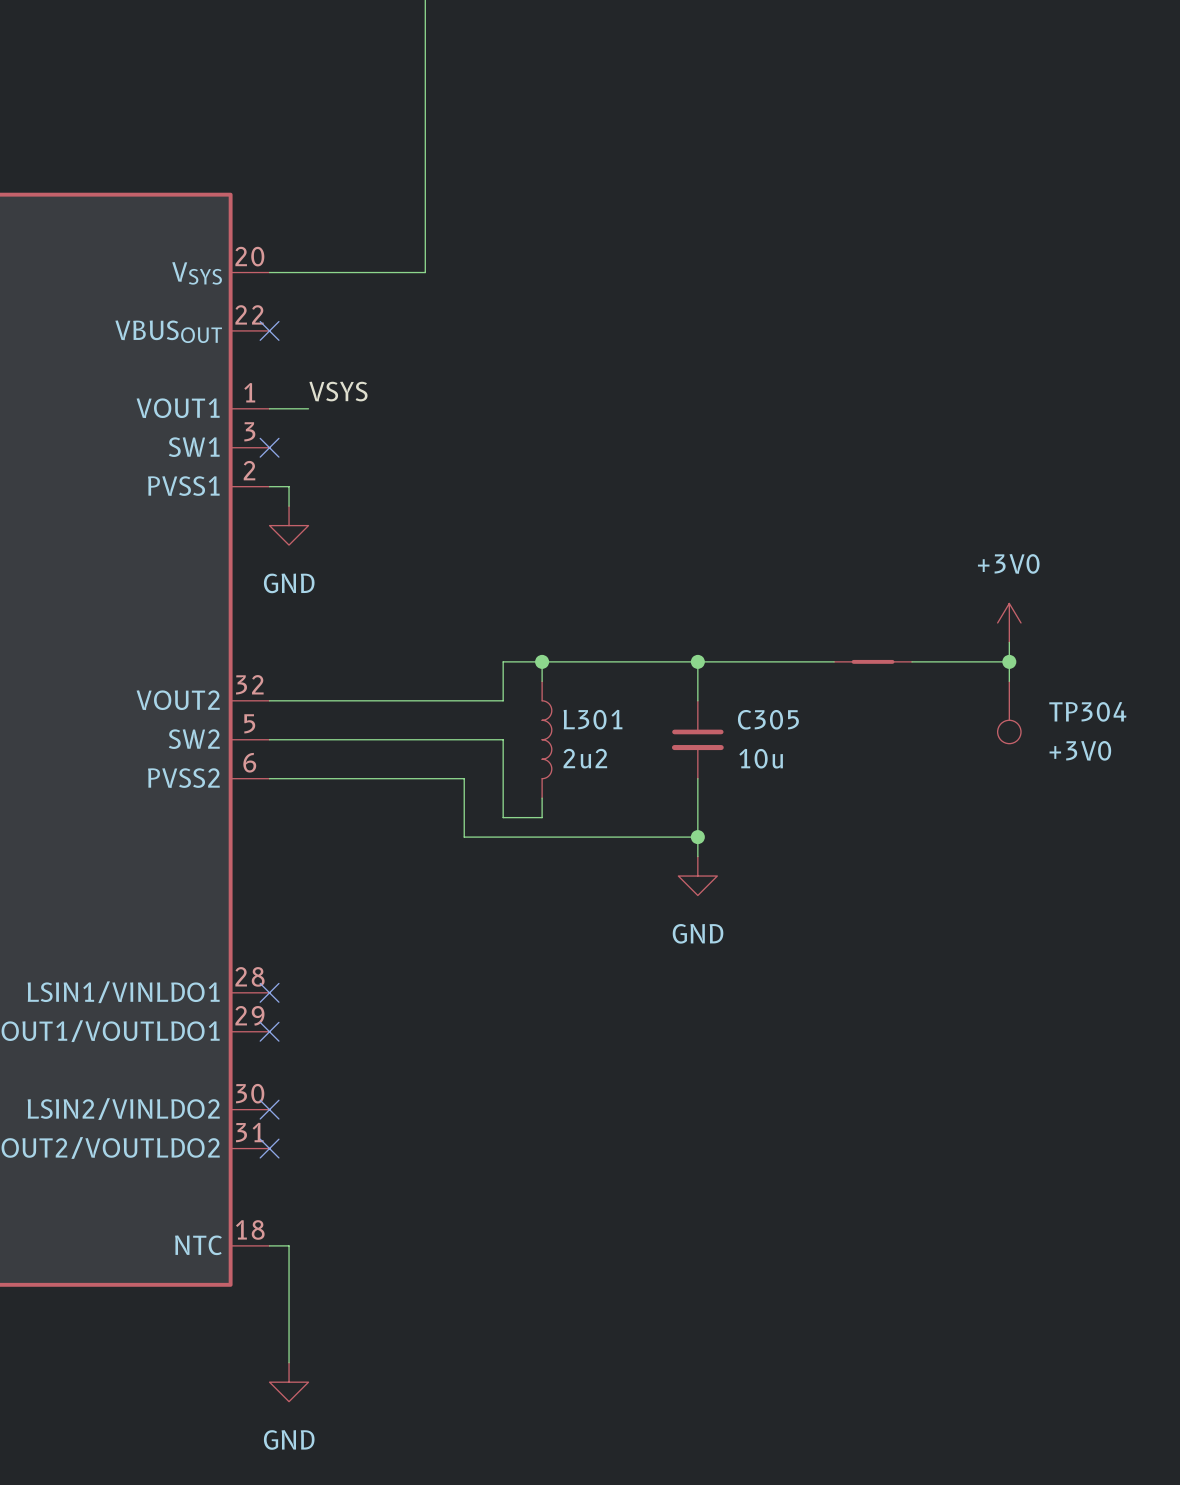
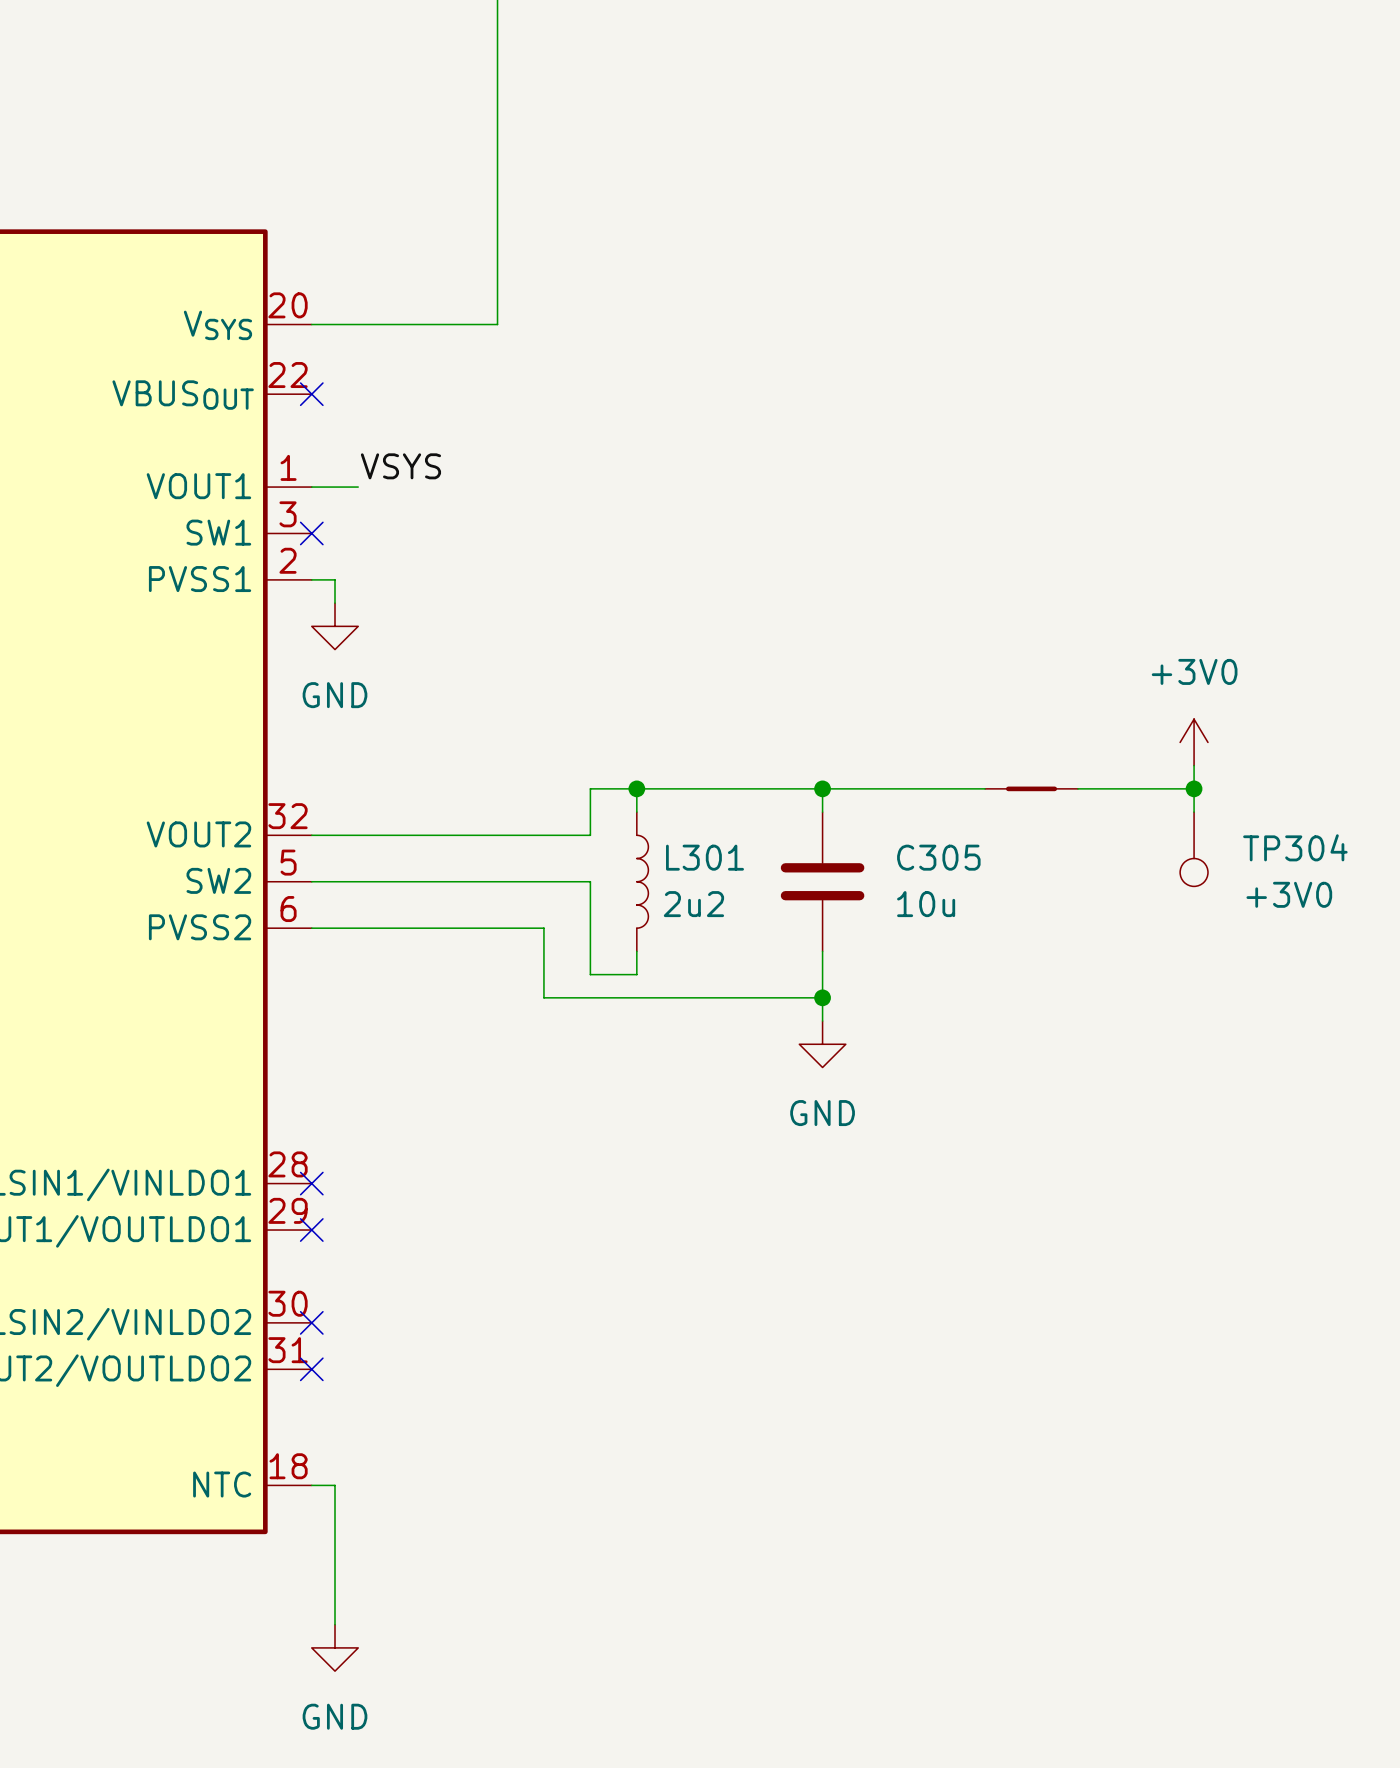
C305 symbol: [671, 700, 724, 779] -> [780, 812, 865, 952]

